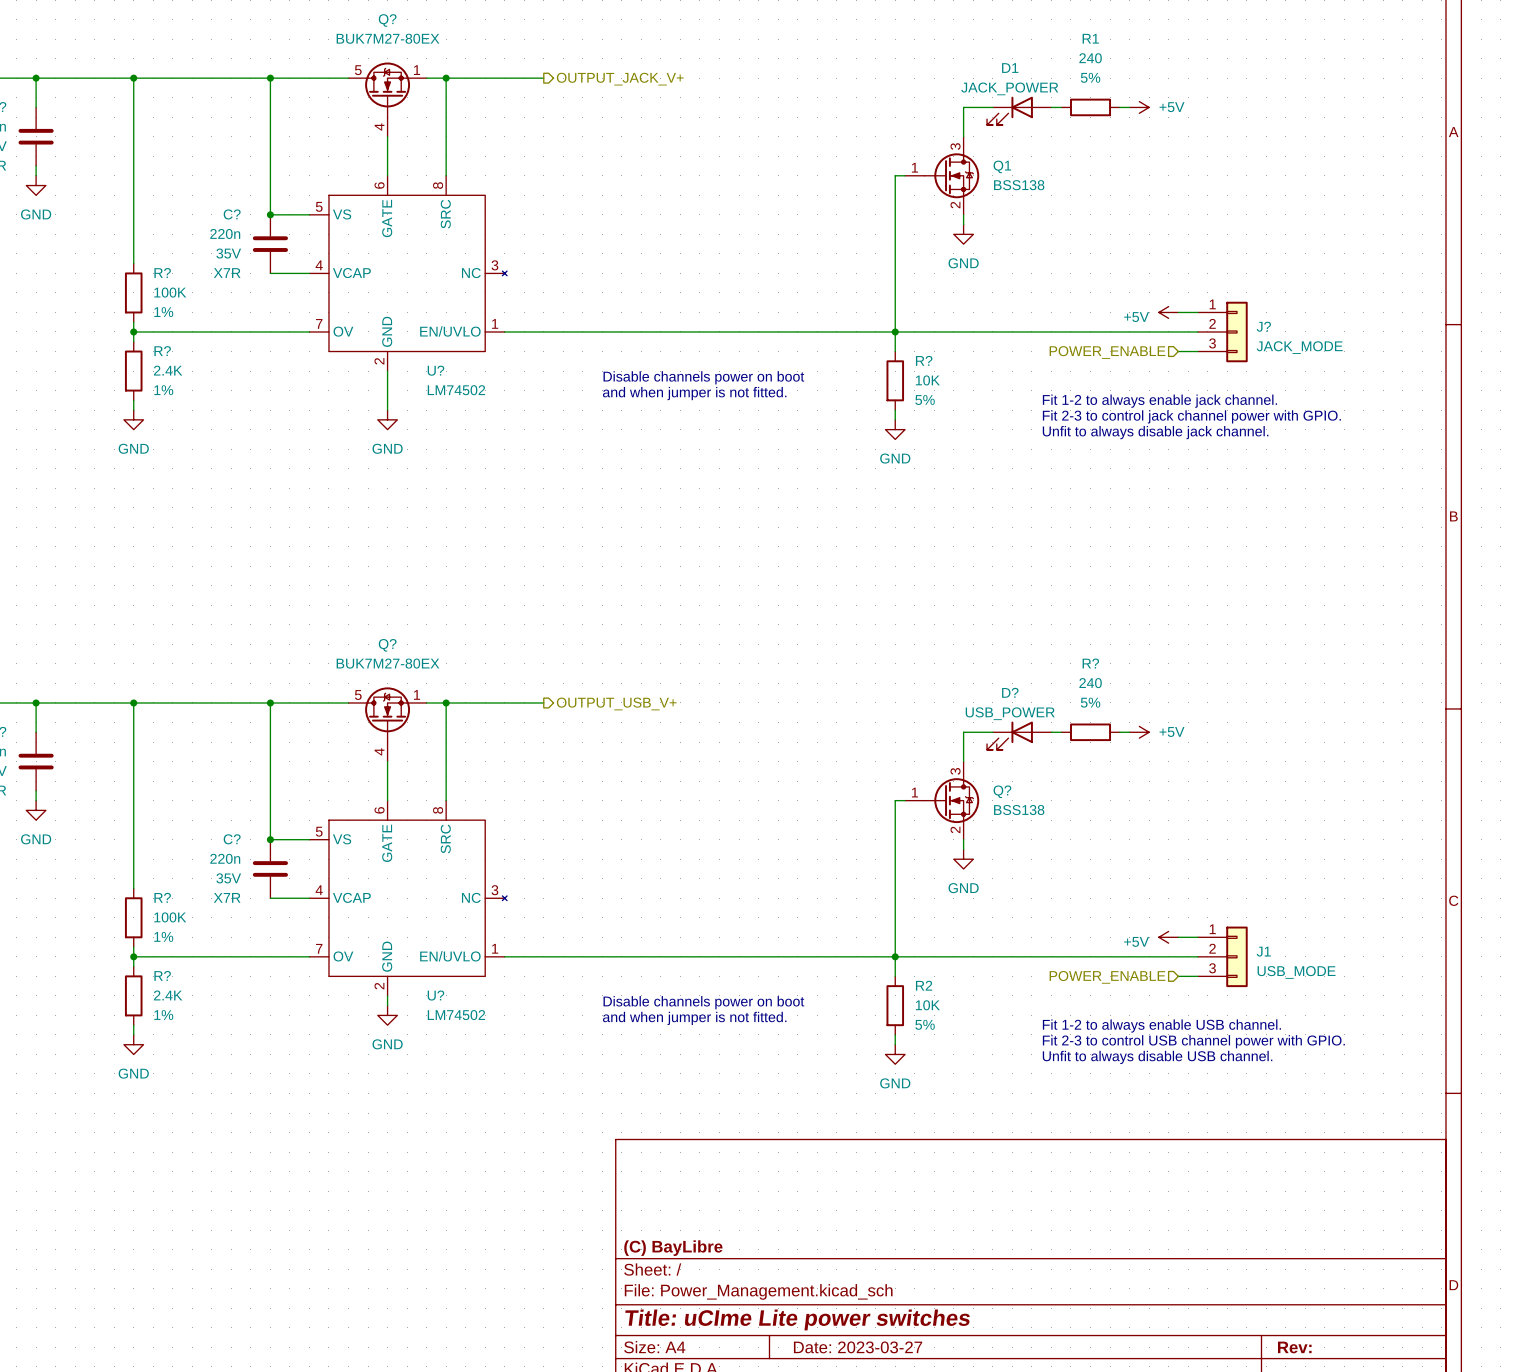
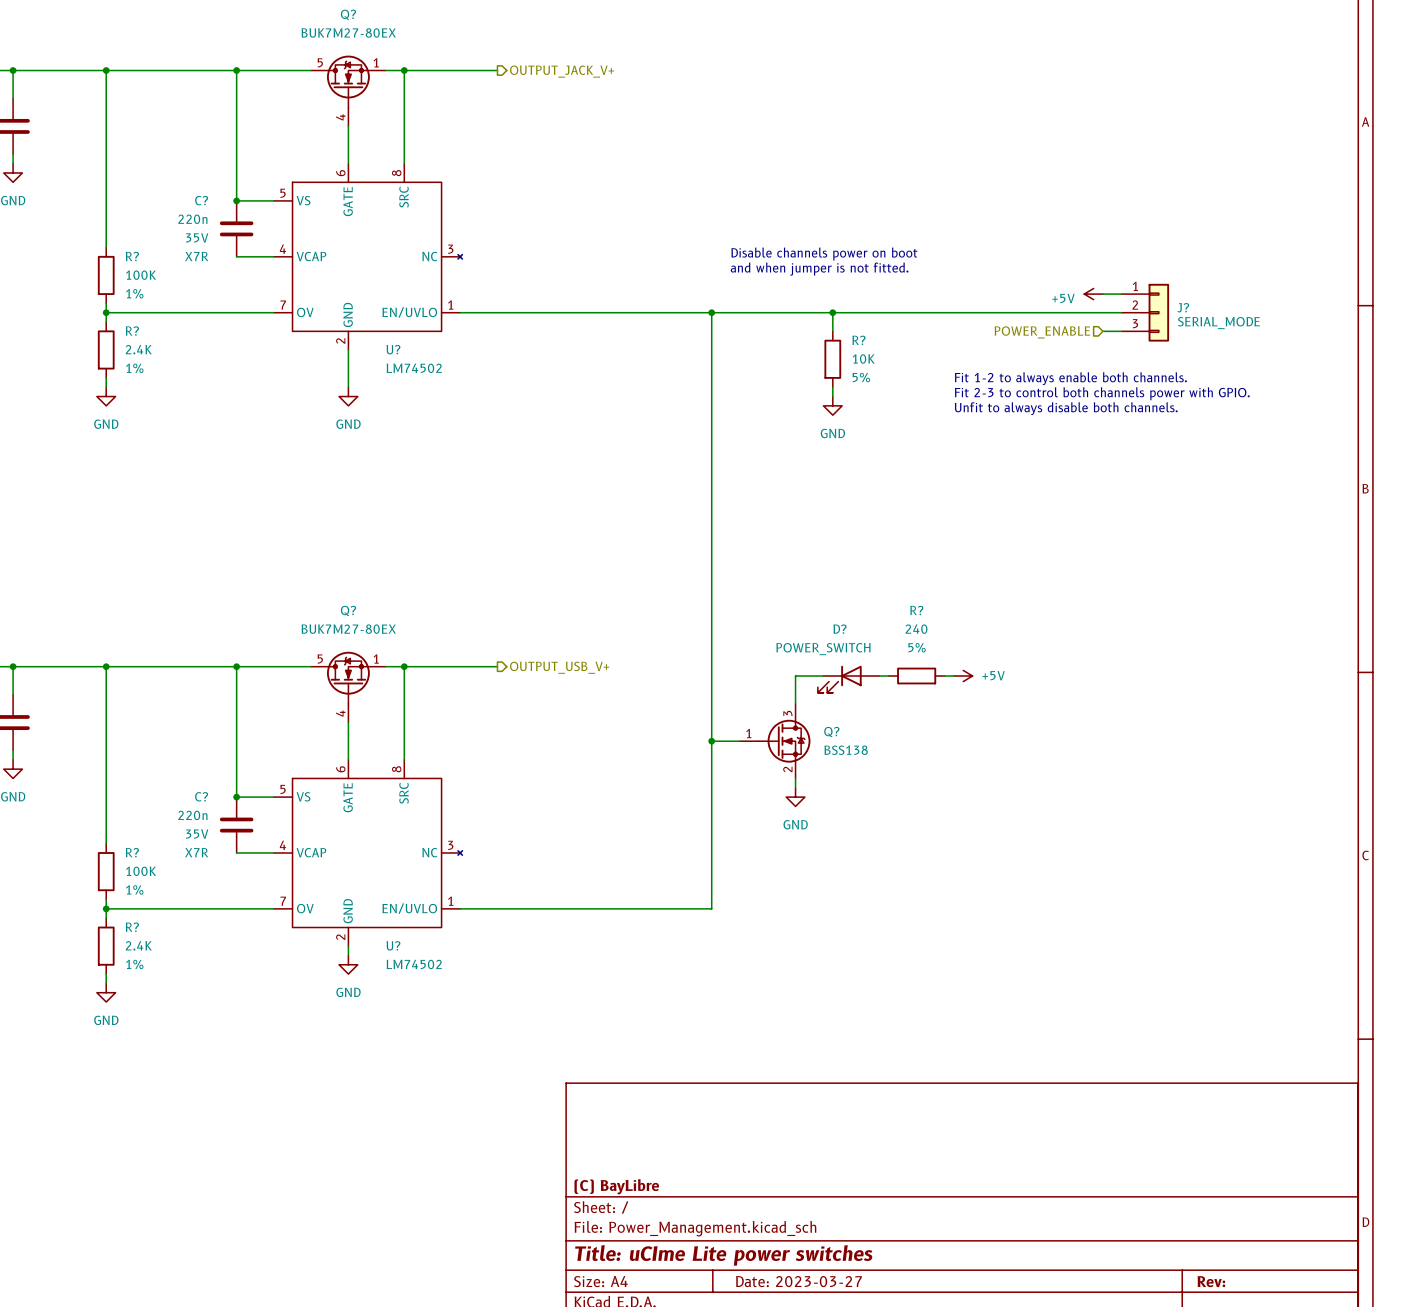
wire: (992, 107) (963, 107) (963, 136) -> none
wire: (1051, 107) (1061, 107) -> none
R1: 240 (1090, 107) -> none
wire: (1119, 107) (1129, 107) -> none
power symbol: +5V (1139, 107) -> none
D1: JACK_POWER (1019, 110) -> none
wire: (905, 175) (895, 175) (895, 331) -> none
Q1: BSS138 (942, 175) -> none
wire: (963, 214) (963, 224) -> none
power symbol: GND (963, 234) -> none
text: none -> Disable channels power on boot (824, 254)
text: none -> and when jumper is not fitted. (819, 269)
junction: none -> (711, 312)
J? value: JACK_MODE (1299, 347) -> SERIAL_MODE (1218, 323)
text: Disable channels power on boot (703, 377) -> none
text: and when jumper is not fitted. (694, 393) -> none
text: Fit 1-2 to always enable jack channel. (1159, 401) -> Fit 1-2 to always enable both channels. (1070, 378)
text: Fit 2-3 to control jack channel power with GPIO. (1191, 416) -> Fit 2-3 to control both channels power with GPIO. (1102, 393)
text: Unfit to always disable jack channel. (1155, 432) -> Unfit to always disable both channels. (1066, 408)
D?: none -> POWER_SWITCH (848, 679)
wire: (992, 732) (963, 732) (963, 761) -> (823, 676) (795, 676) (795, 703)
wire: (1051, 732) (1061, 732) -> (879, 676) (888, 676)
R? position: (1090, 732) -> (916, 676)
wire: (1119, 732) (1129, 732) -> (944, 676) (953, 676)
power symbol position: +5V (1139, 732) -> +5V (963, 676)
D?: USB_POWER (1019, 735) -> none
wire: none -> (711, 741) (739, 741)
junction: none -> (711, 741)
wire: (905, 800) (895, 800) (895, 976) -> none
Q? position: (942, 800) -> (775, 741)
power symbol: none -> GND (795, 797)
wire: (963, 839) (963, 849) -> (795, 778) (795, 787)
power symbol: GND (963, 859) -> none
power symbol: +5V (1168, 937) -> none
wire: (1178, 937) (1197, 937) -> none
wire: (768, 956) (1197, 956) -> (711, 908) (711, 312)
junction: (895, 956) -> none
J1: USB_MODE (1222, 956) -> none
wire: (1178, 976) (1197, 976) -> none
hierarchical label: POWER_ENABLE (1107, 977) -> none
text: Disable channels power on boot (703, 1002) -> none
R2: 10K (895, 1005) -> none
text: and when jumper is not fitted. (694, 1018) -> none
text: Fit 1-2 to always enable USB channel. (1161, 1026) -> none
wire: (895, 1034) (895, 1044) -> none
text: Fit 2-3 to control USB channel power with GPIO. (1193, 1041) -> none
power symbol: GND (895, 1054) -> none
text: Unfit to always disable USB channel. (1157, 1057) -> none

